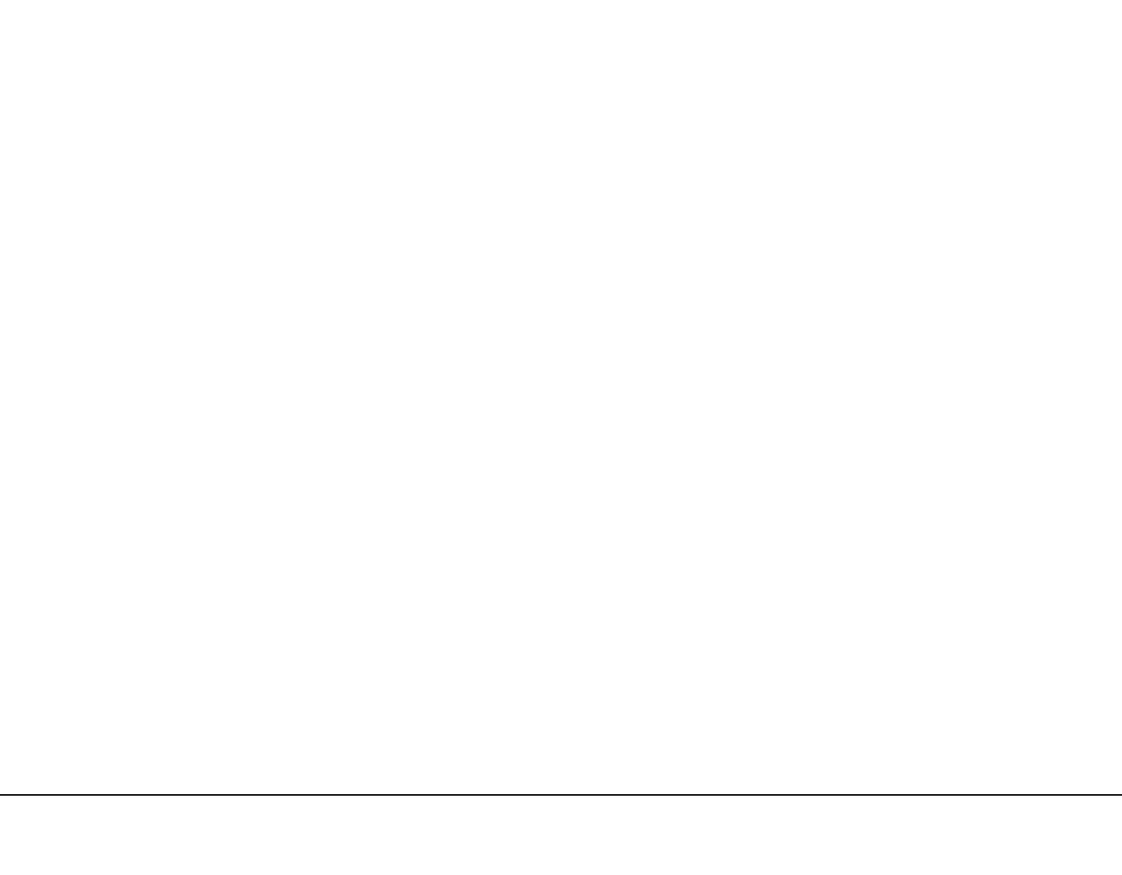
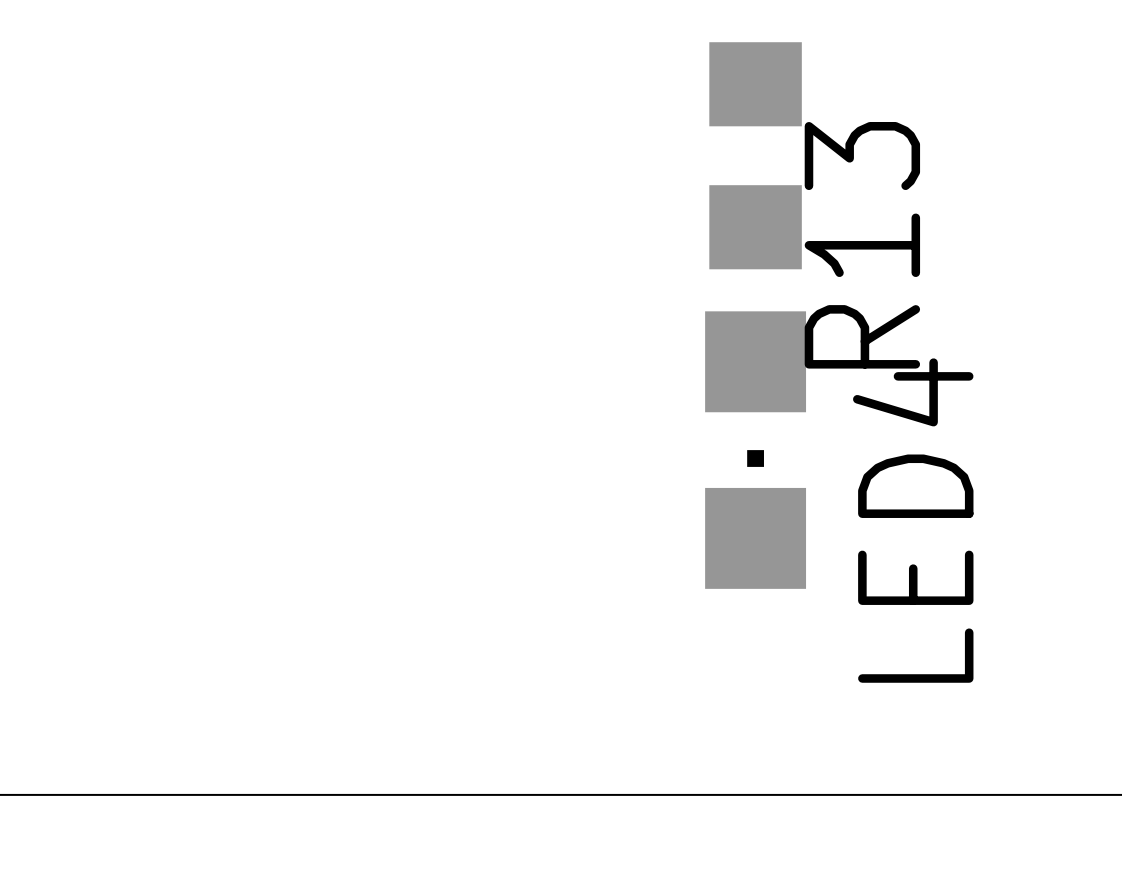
R13: none -> (755, 155)
LED4: none -> (755, 450)

